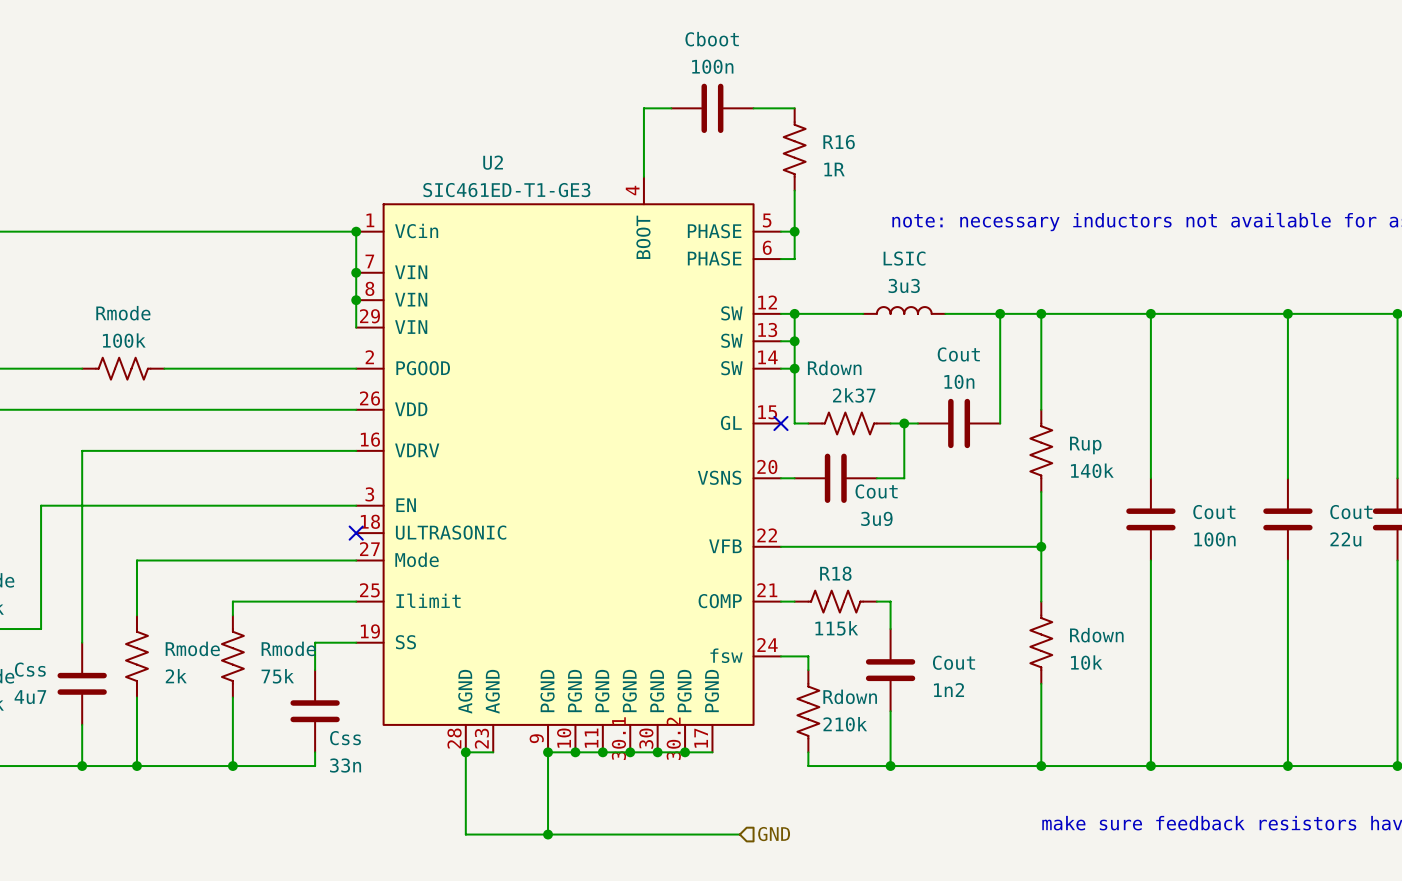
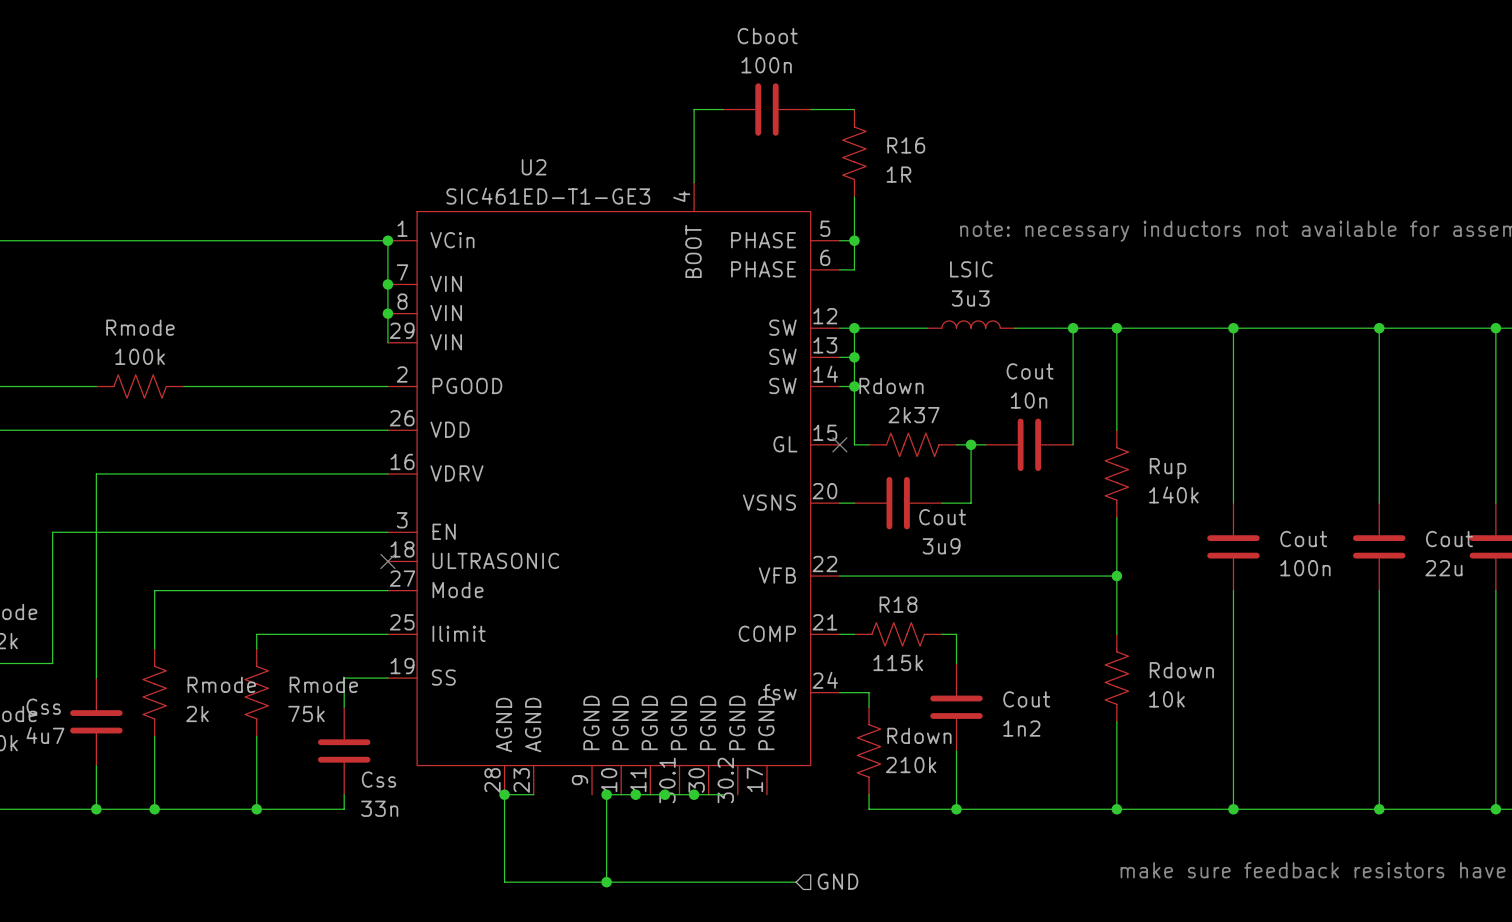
junction: (548, 752) -> none
wire: (561, 752) (548, 752) (548, 834) -> (606, 794) (606, 882)
junction: none -> (606, 794)
junction: (575, 752) -> none
junction: none -> (635, 794)
junction: (602, 752) -> none
junction: none -> (664, 794)
junction: (630, 752) -> none
junction: none -> (694, 794)
junction: (657, 752) -> none
wire: (671, 752) (712, 752) -> none
junction: (685, 752) -> none
junction position: (548, 834) -> (606, 882)

